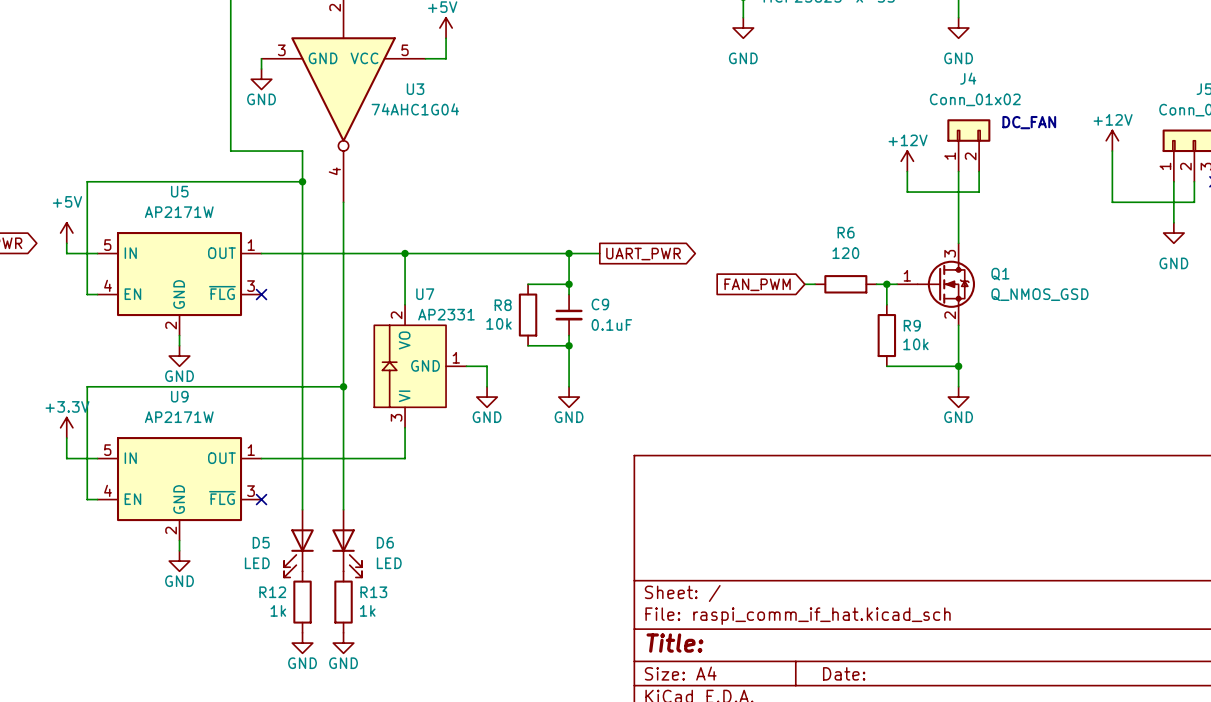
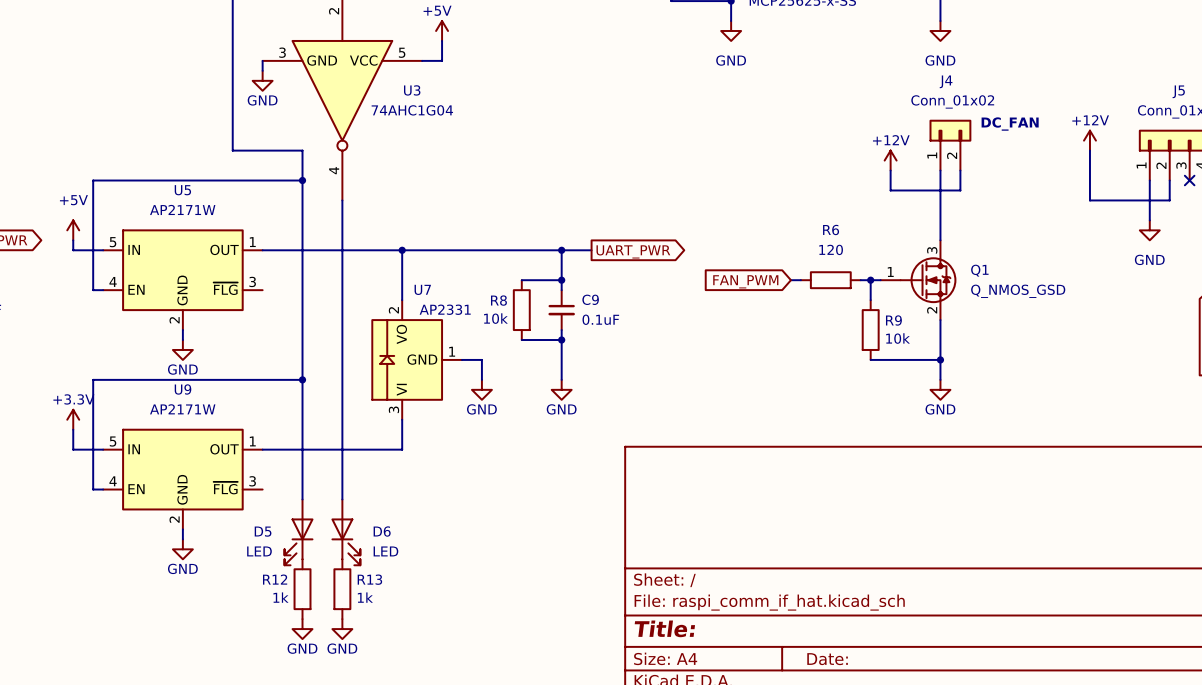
no-connect mark: (261, 294) -> none
wire: (302, 386) (343, 386) -> none
junction position: (343, 386) -> (302, 379)
no-connect mark: (261, 499) -> none

